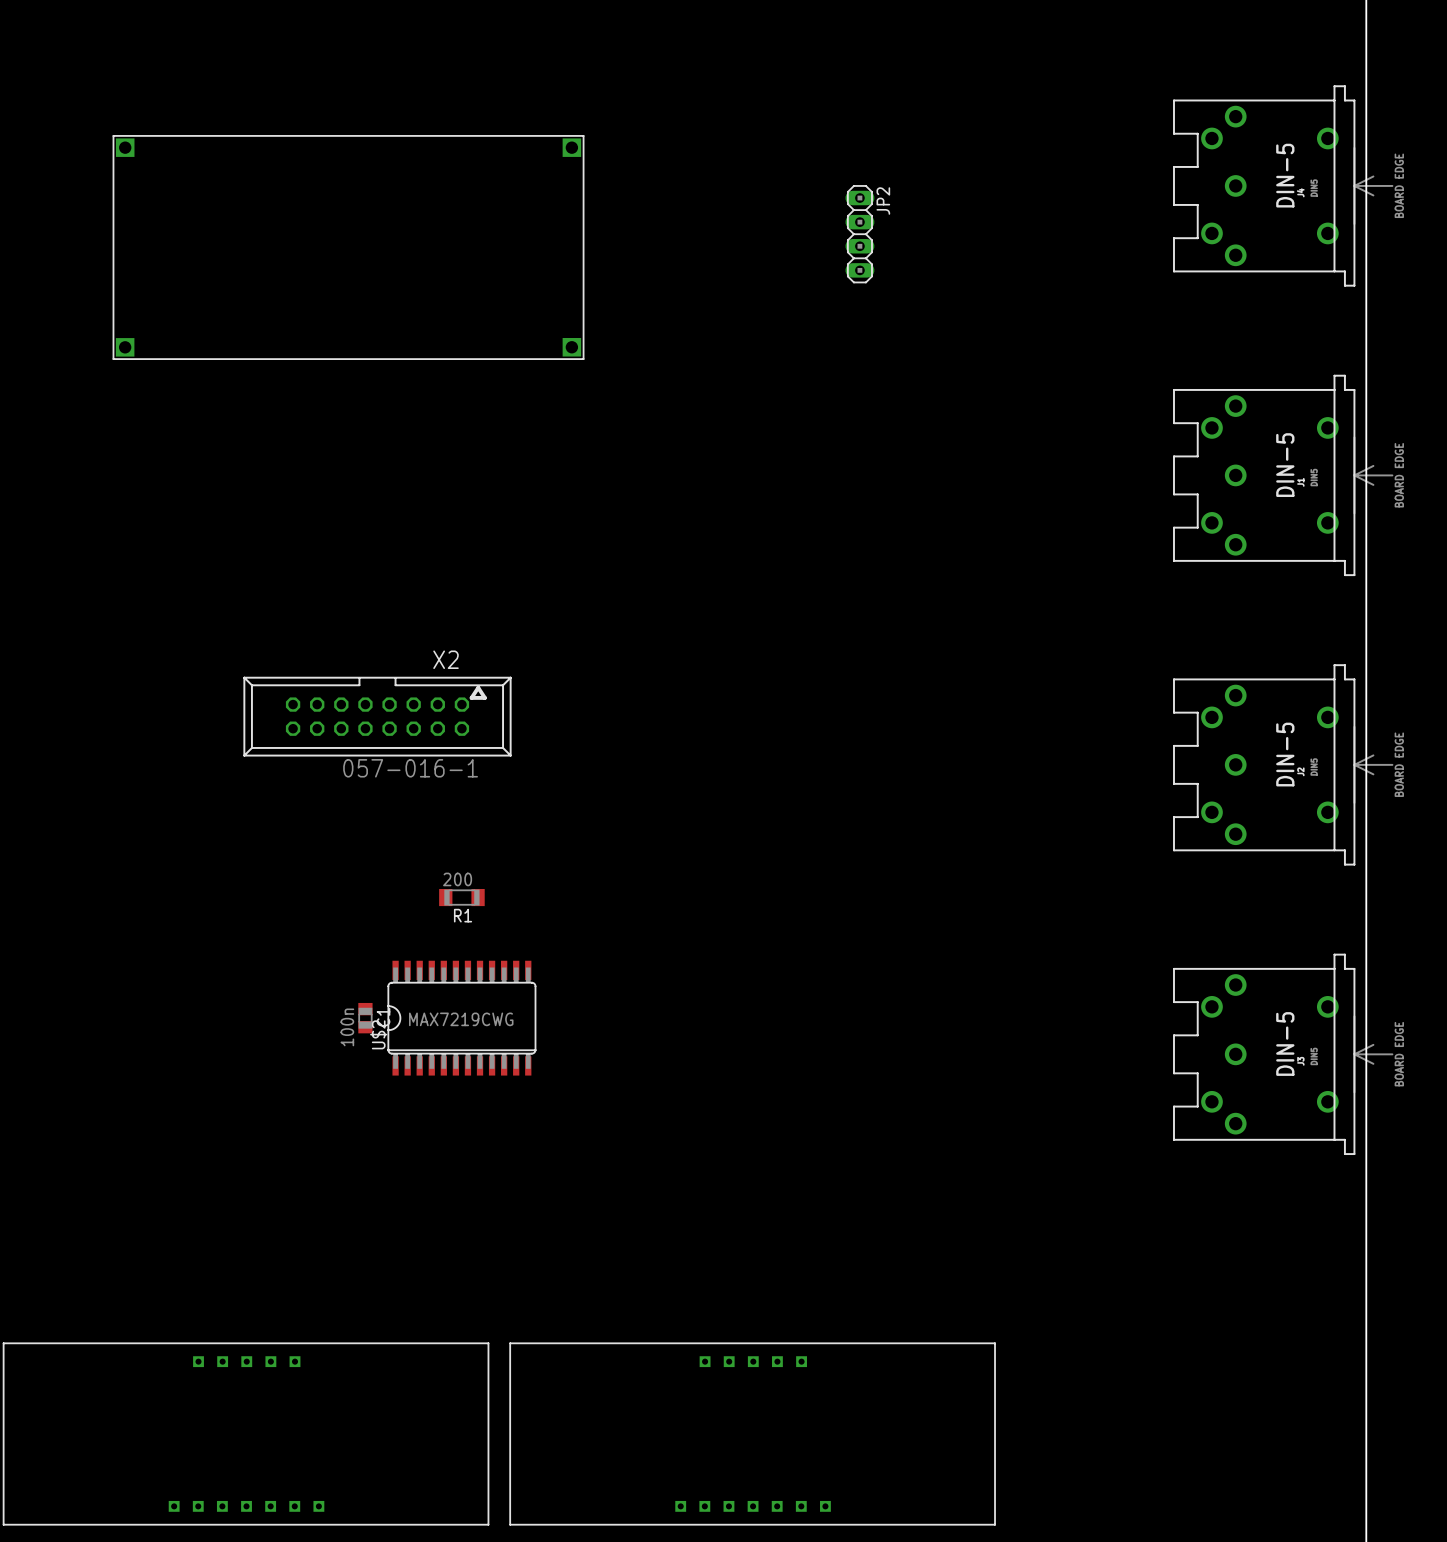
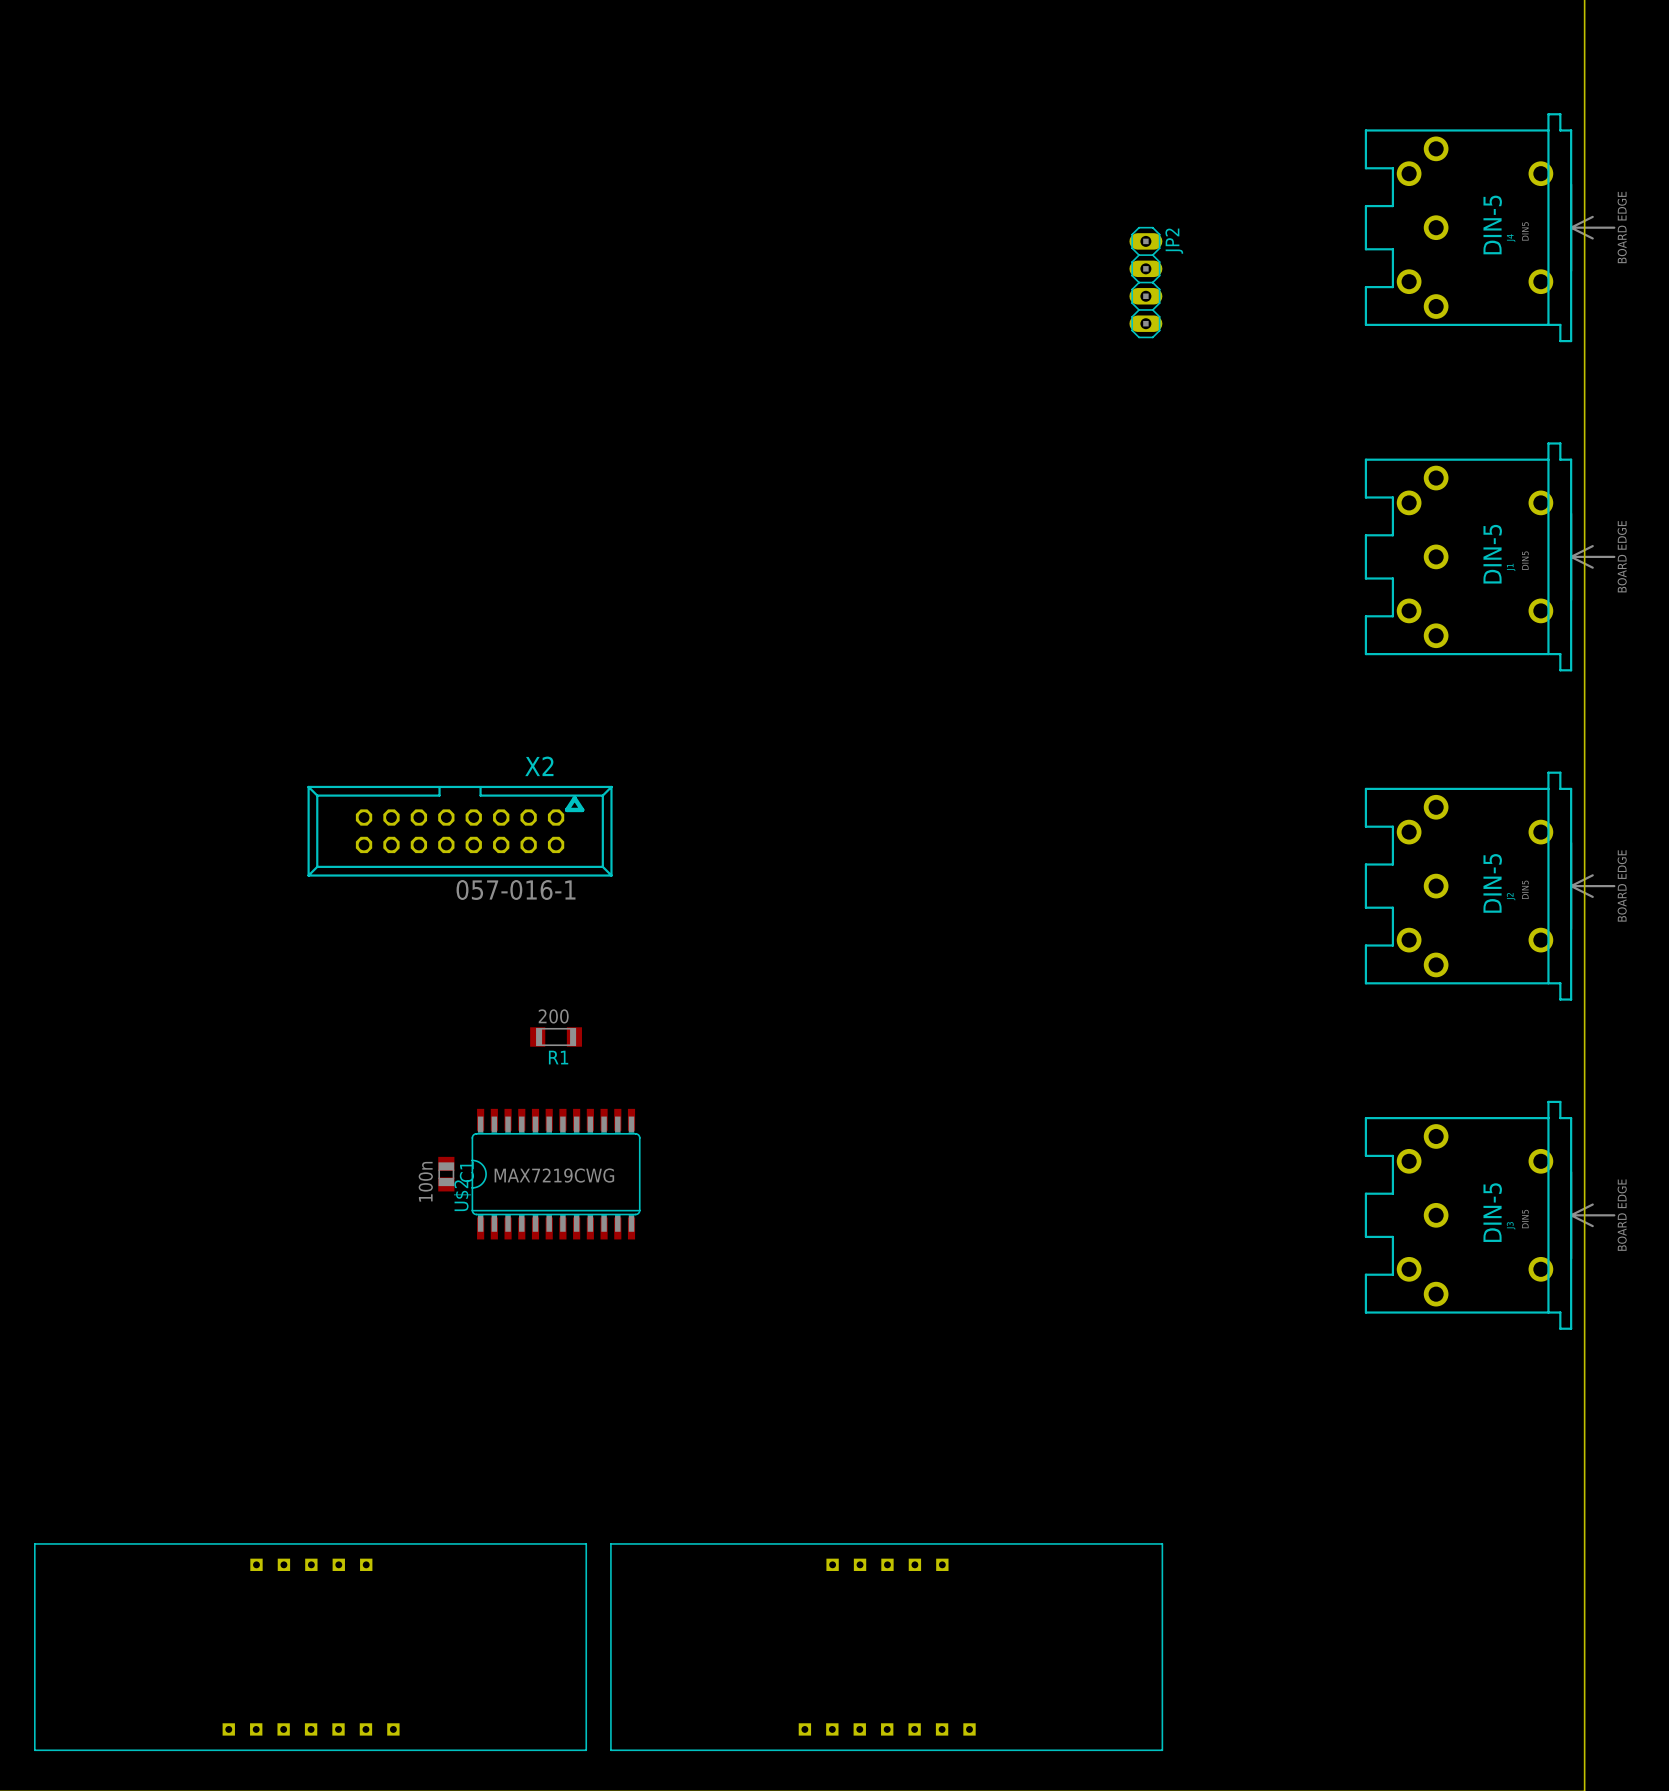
JP2 position: (859, 234) -> (1145, 282)
part: (348, 247) -> none

